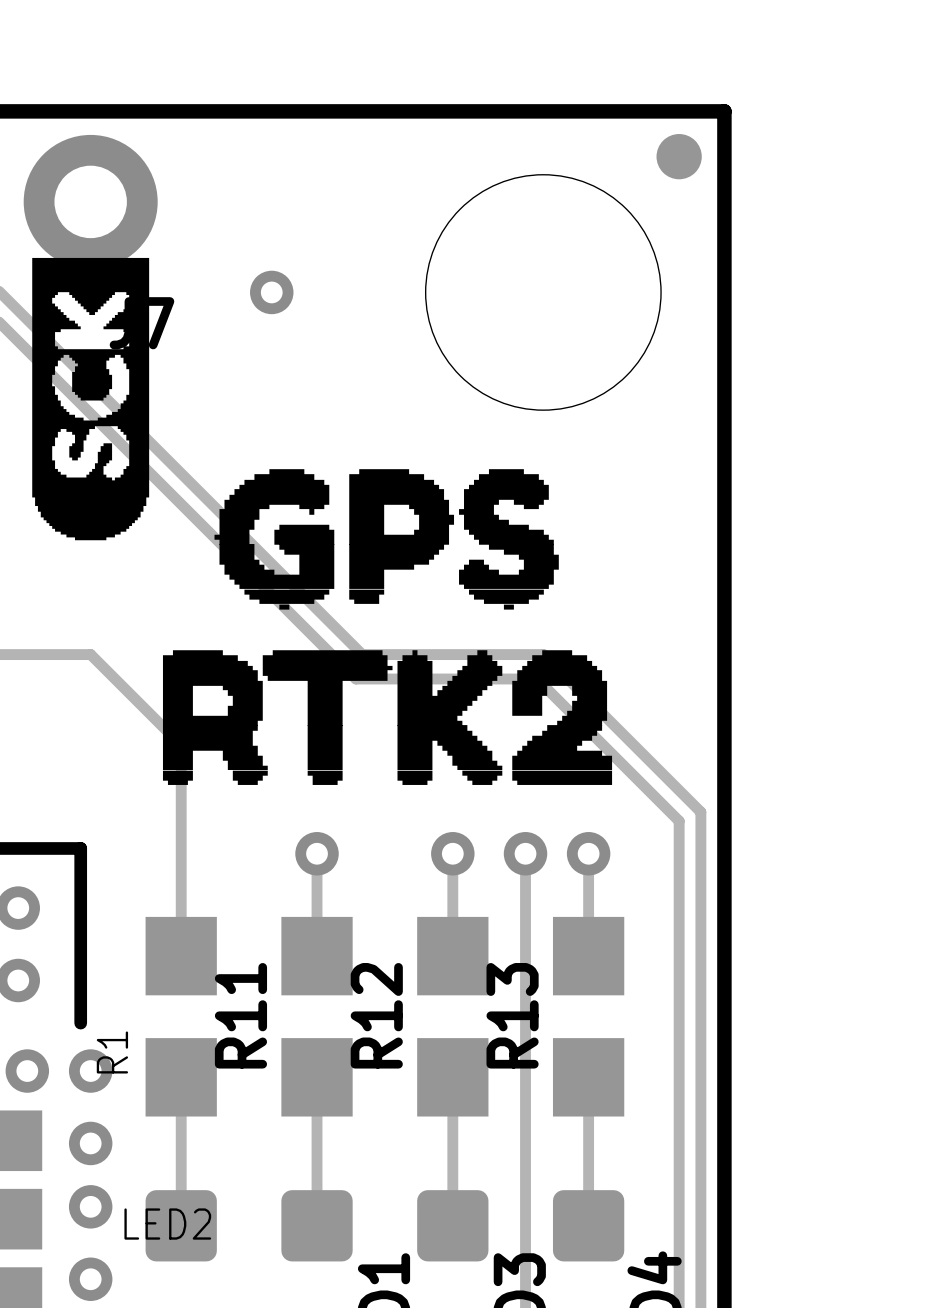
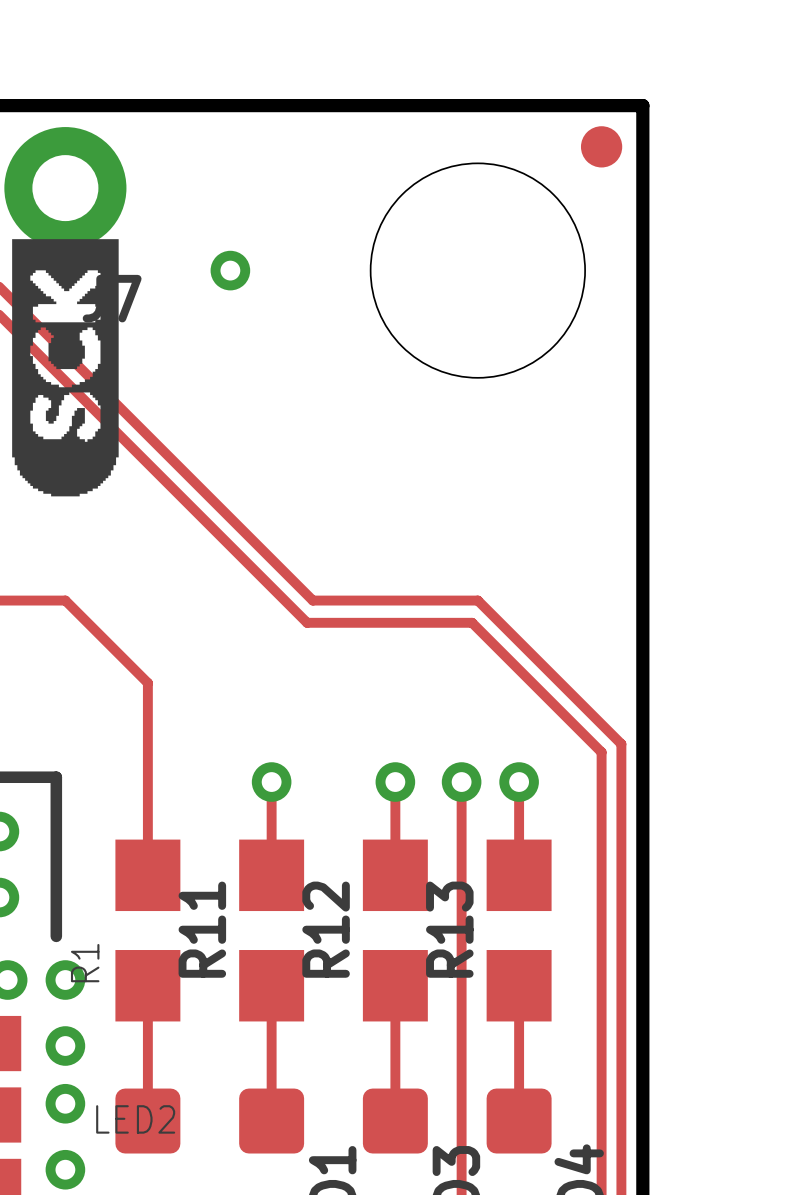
drawing: [162, 469, 613, 785] -> none

